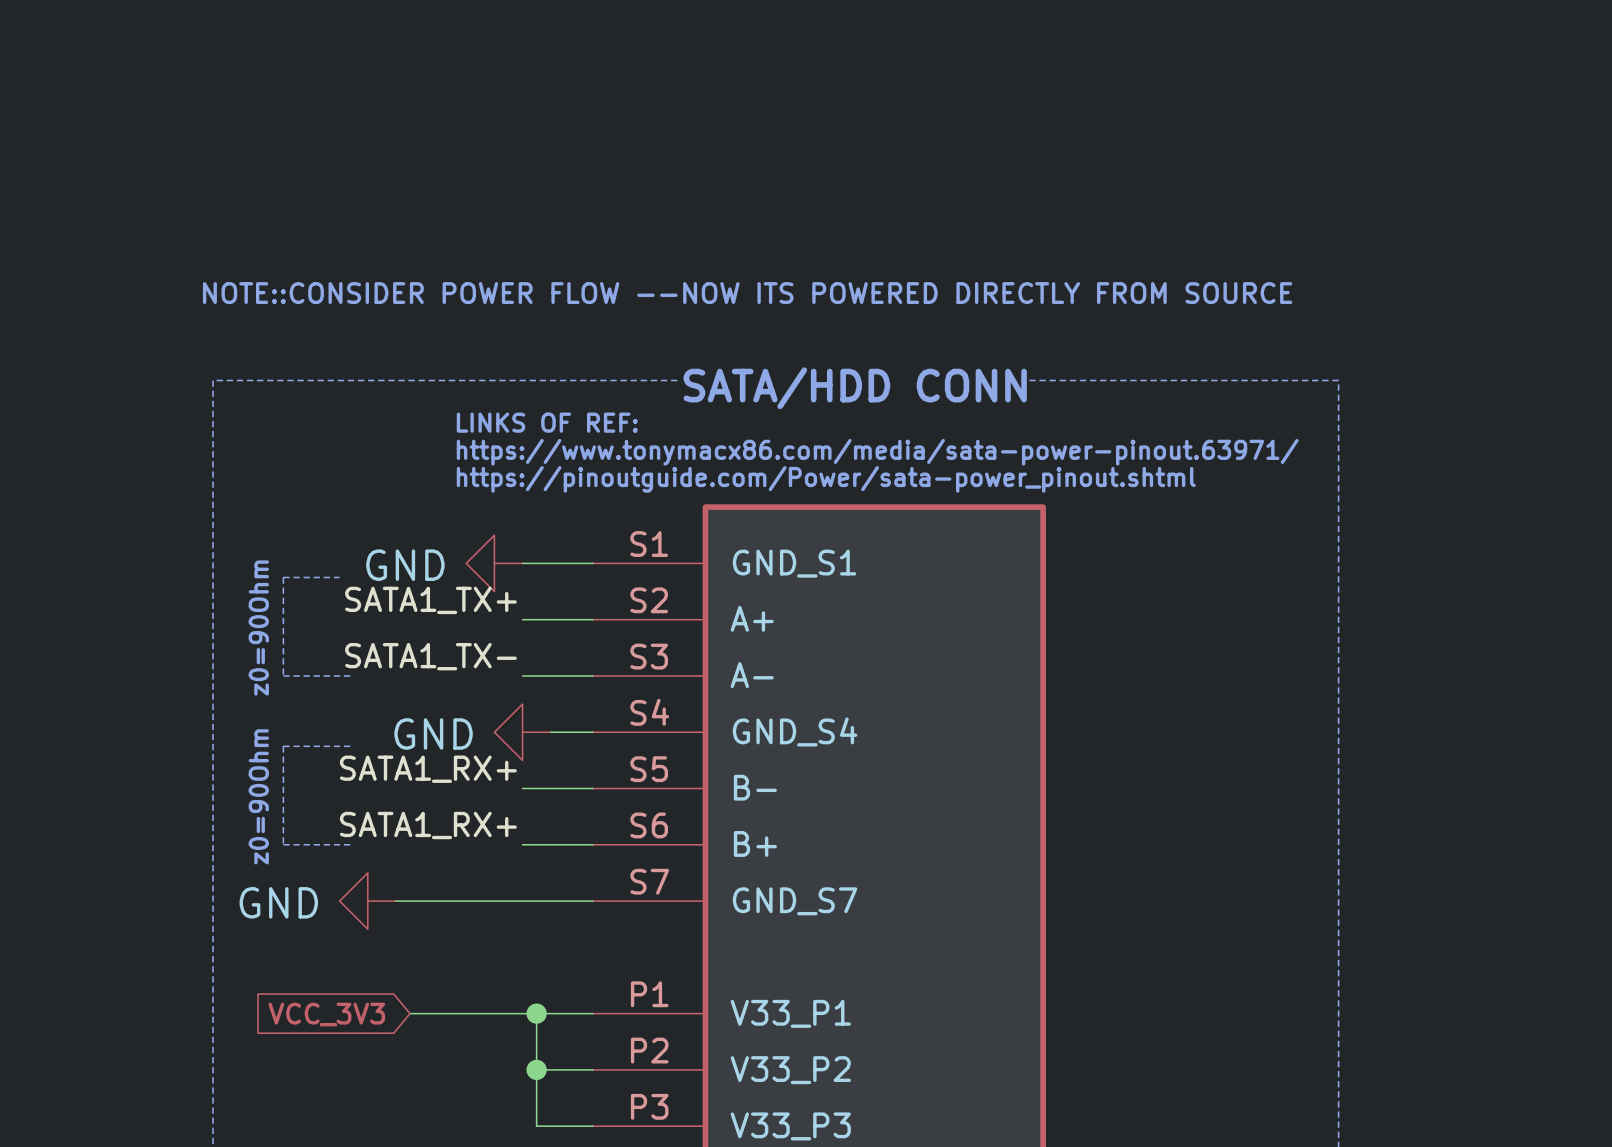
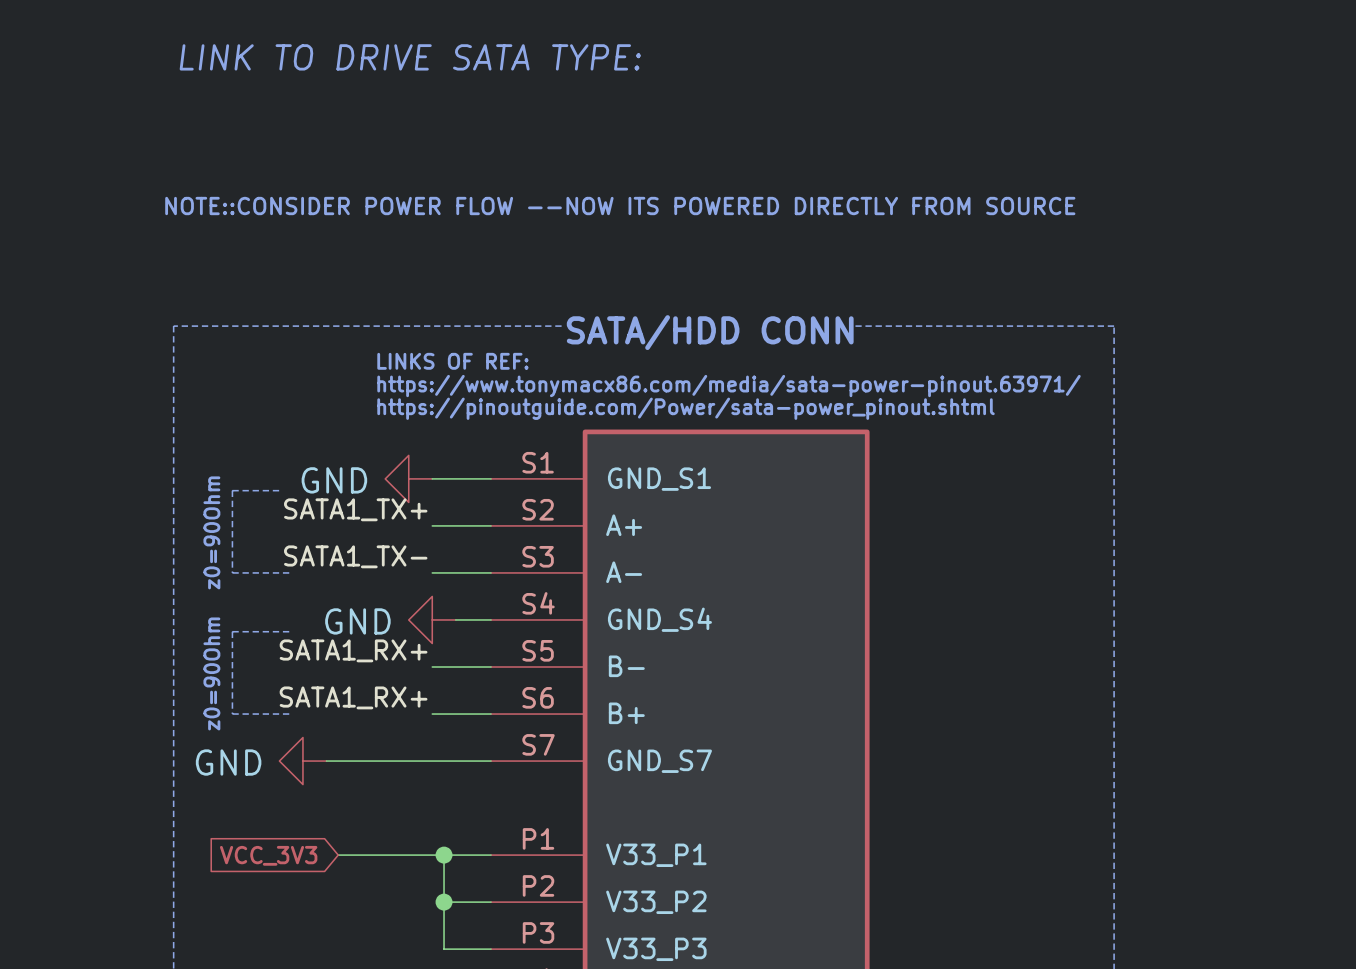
text: none -> LINK TO DRIVE SATA TYPE: (410, 57)
text position: NOTE::CONSIDER POWER FLOW --NOW ITS POWERED DIRECTLY FROM SOURCE (747, 293) -> NOTE::CONSIDER POWER FLOW --NOW ITS POWERED DIRECTLY FROM SOURCE (620, 206)

